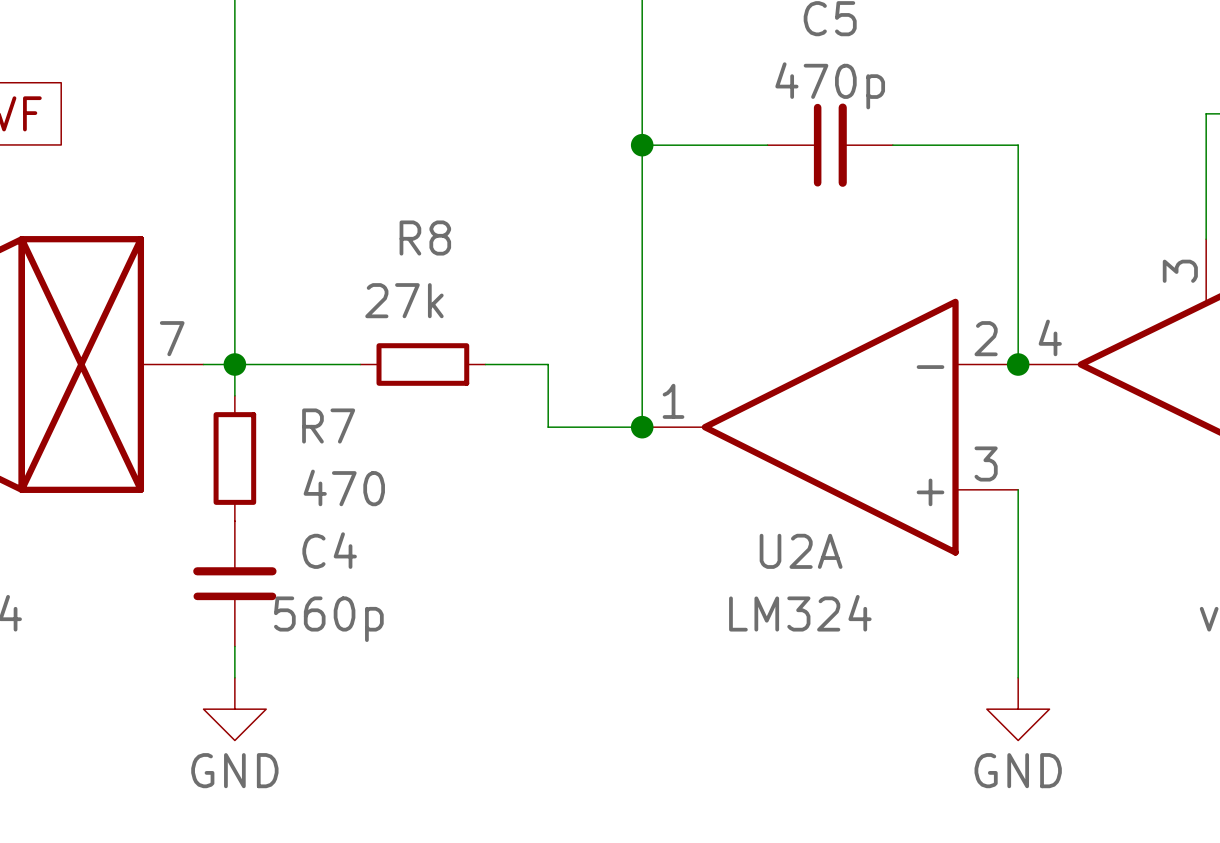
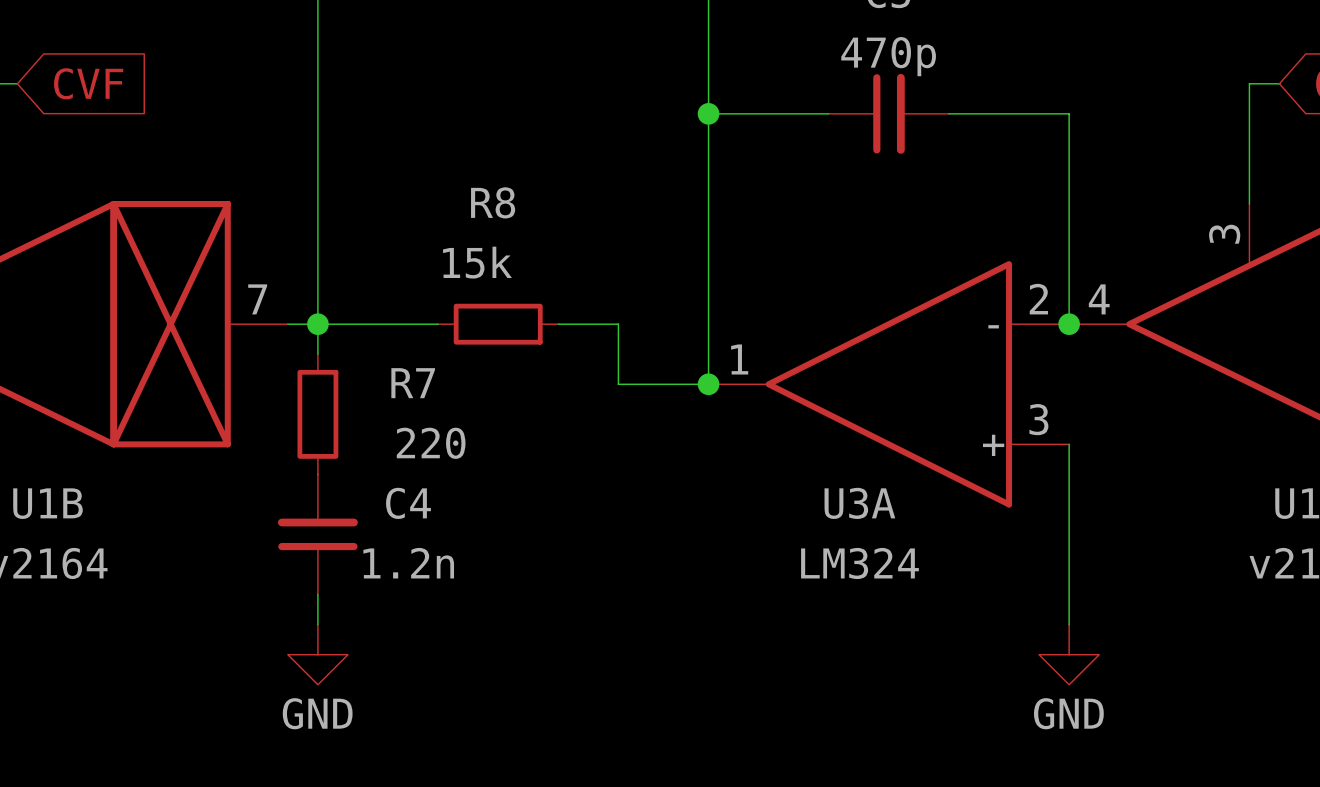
R8 value: 27k (404, 300) -> 15k (477, 262)
R7 value: 470 (344, 487) -> 220 (431, 443)
U2A name: U2A (801, 551) -> U3A (859, 503)
C4 value: 560p (328, 619) -> 1.2n (408, 563)

